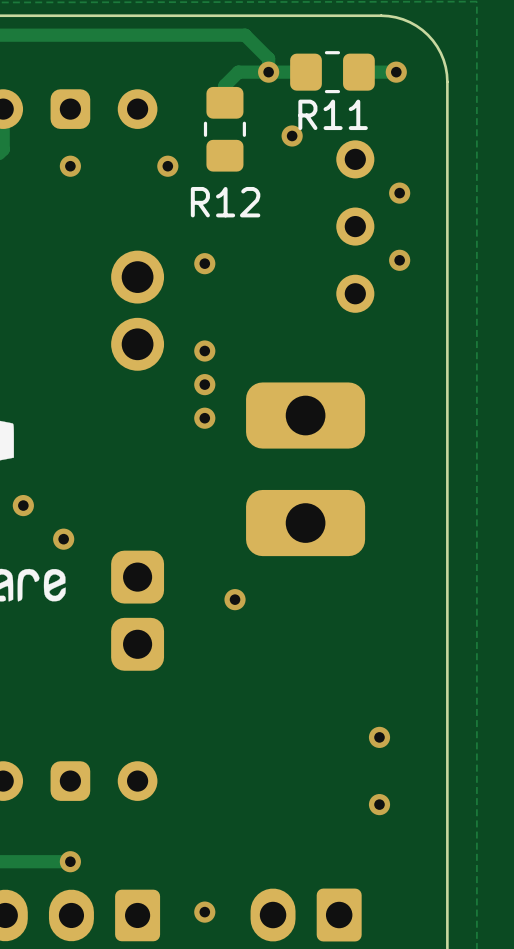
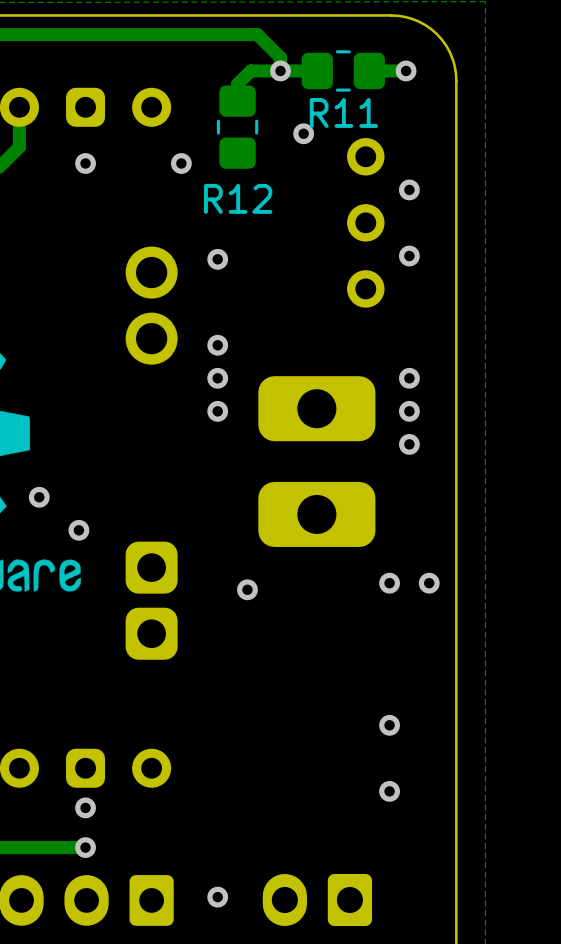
via: none -> (409, 378)
via: none -> (409, 411)
via: none -> (409, 444)
via: none -> (389, 583)
via: none -> (429, 583)
via: none -> (85, 807)

